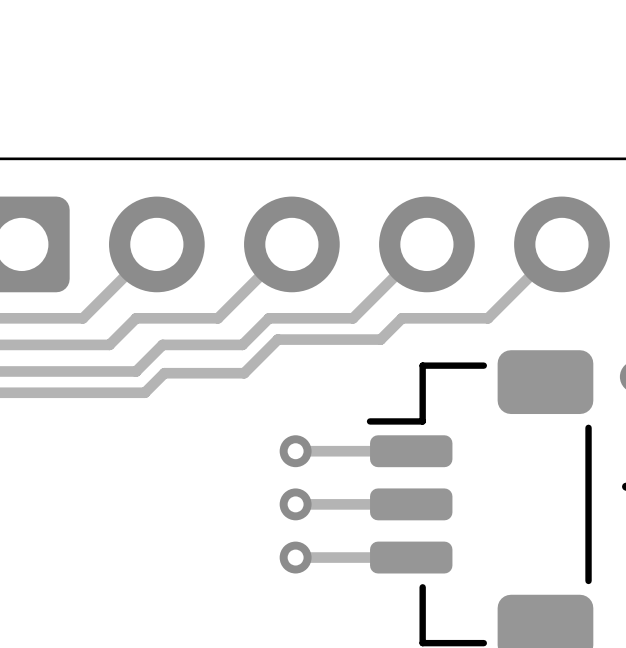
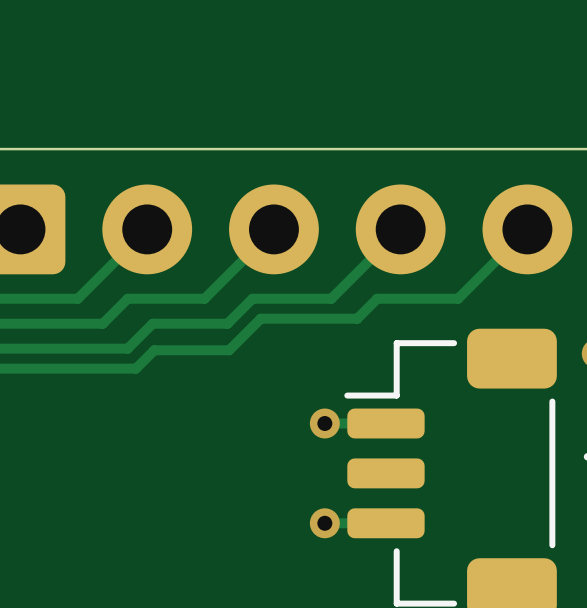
track: (295, 451) (346, 451) -> none
via: (295, 451) -> none
via: none -> (324, 423)
track: (295, 504) (411, 504) -> none
via: (295, 504) -> none
track: (295, 557) (346, 557) -> none
via: (295, 557) -> none
via: none -> (324, 523)

